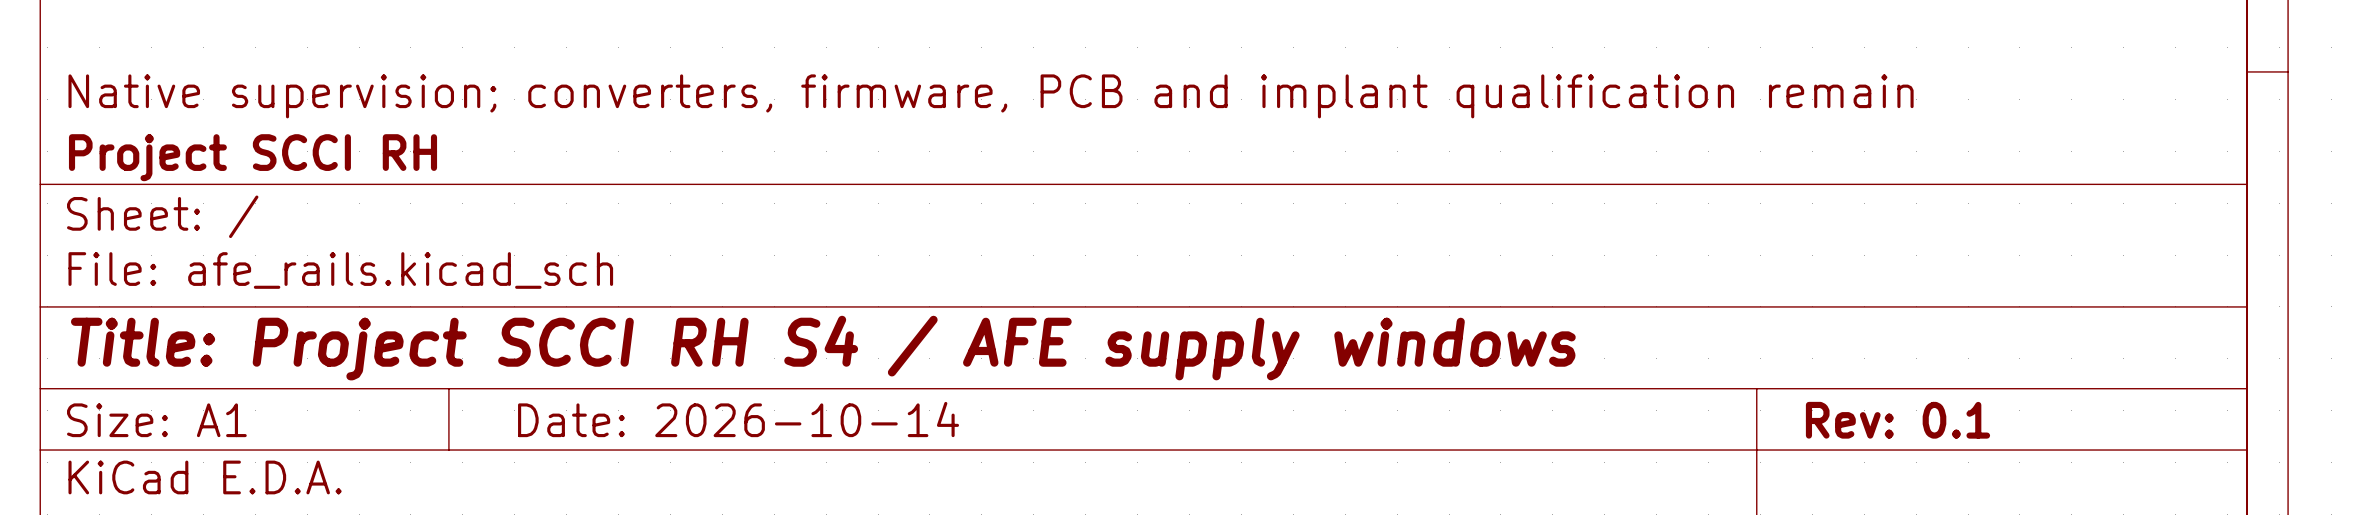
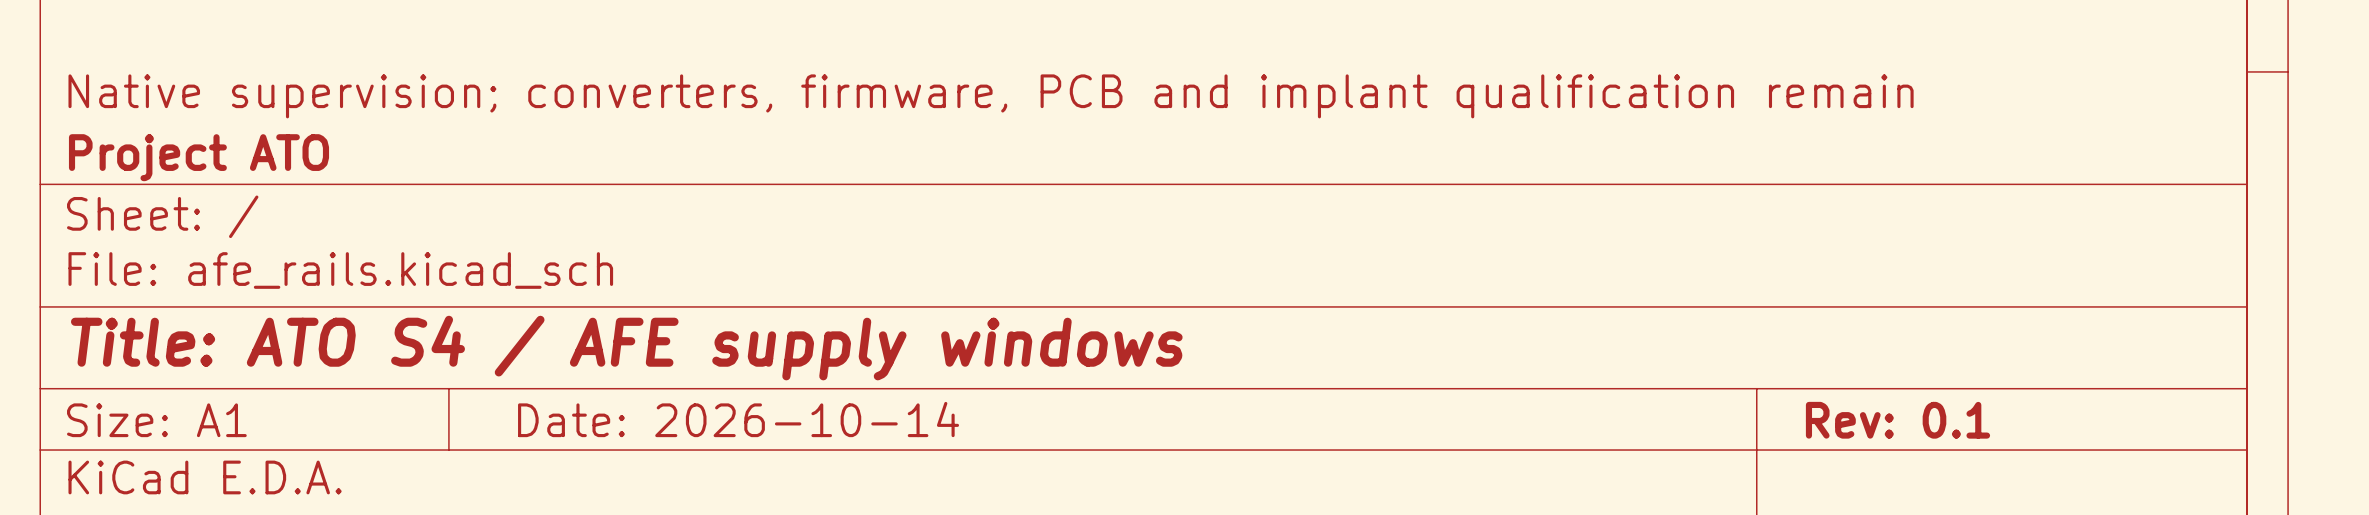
title block: Project SCCI RH (253, 157) -> Project ATO (199, 157)
title block: Title: Project SCCI RH S4 / AFE supply windows (823, 348) -> Title: ATO S4 / AFE supply windows (626, 348)

